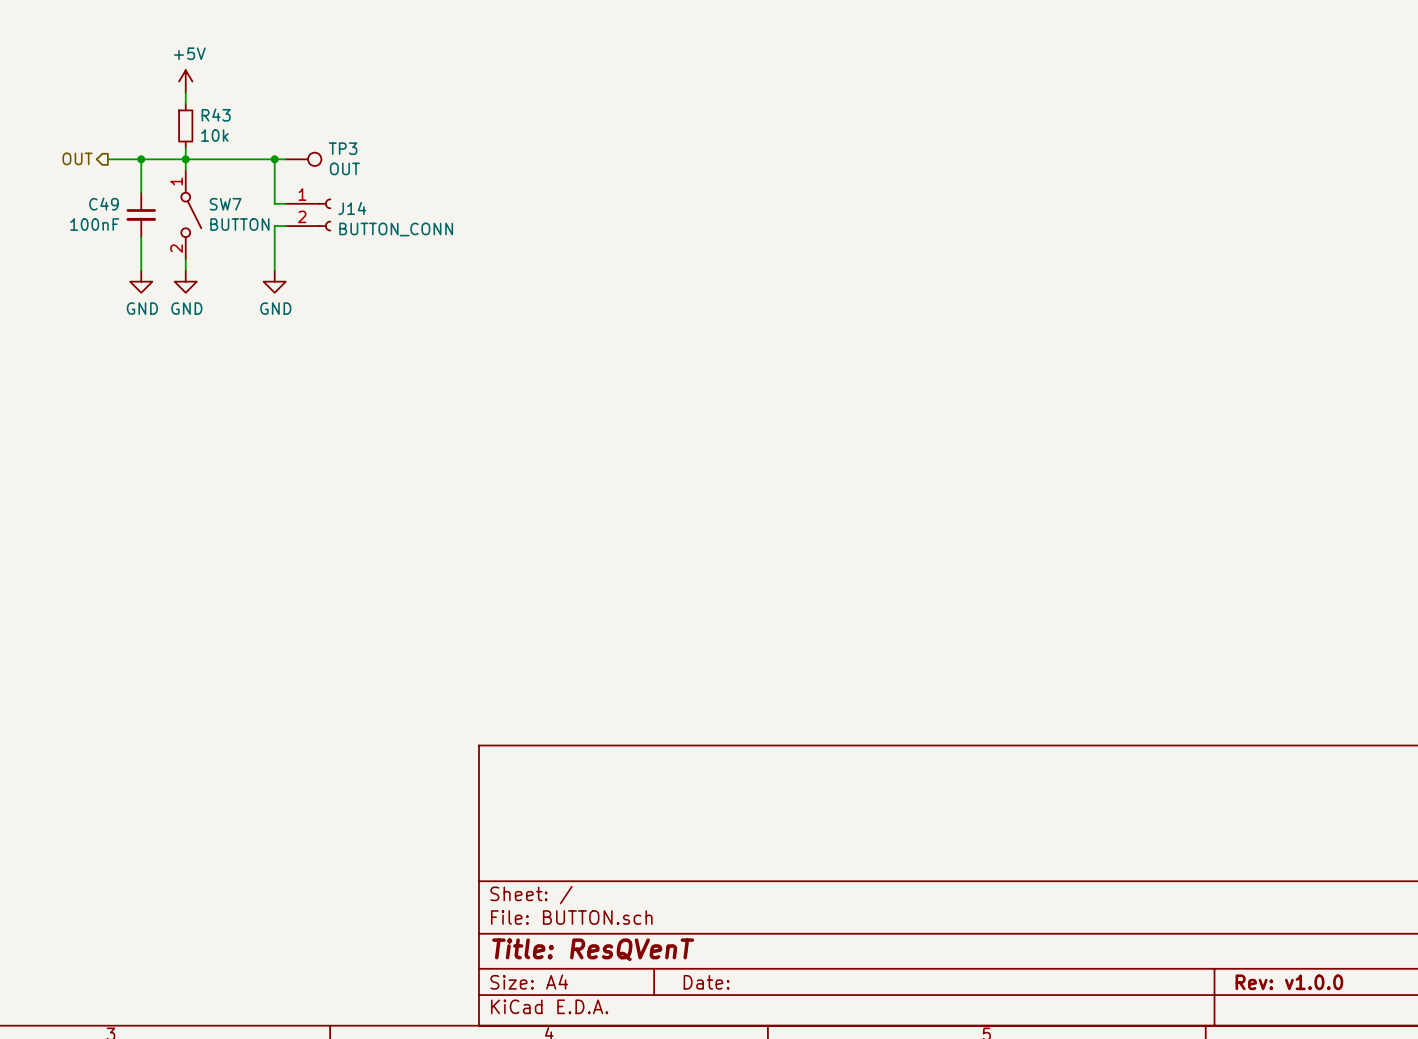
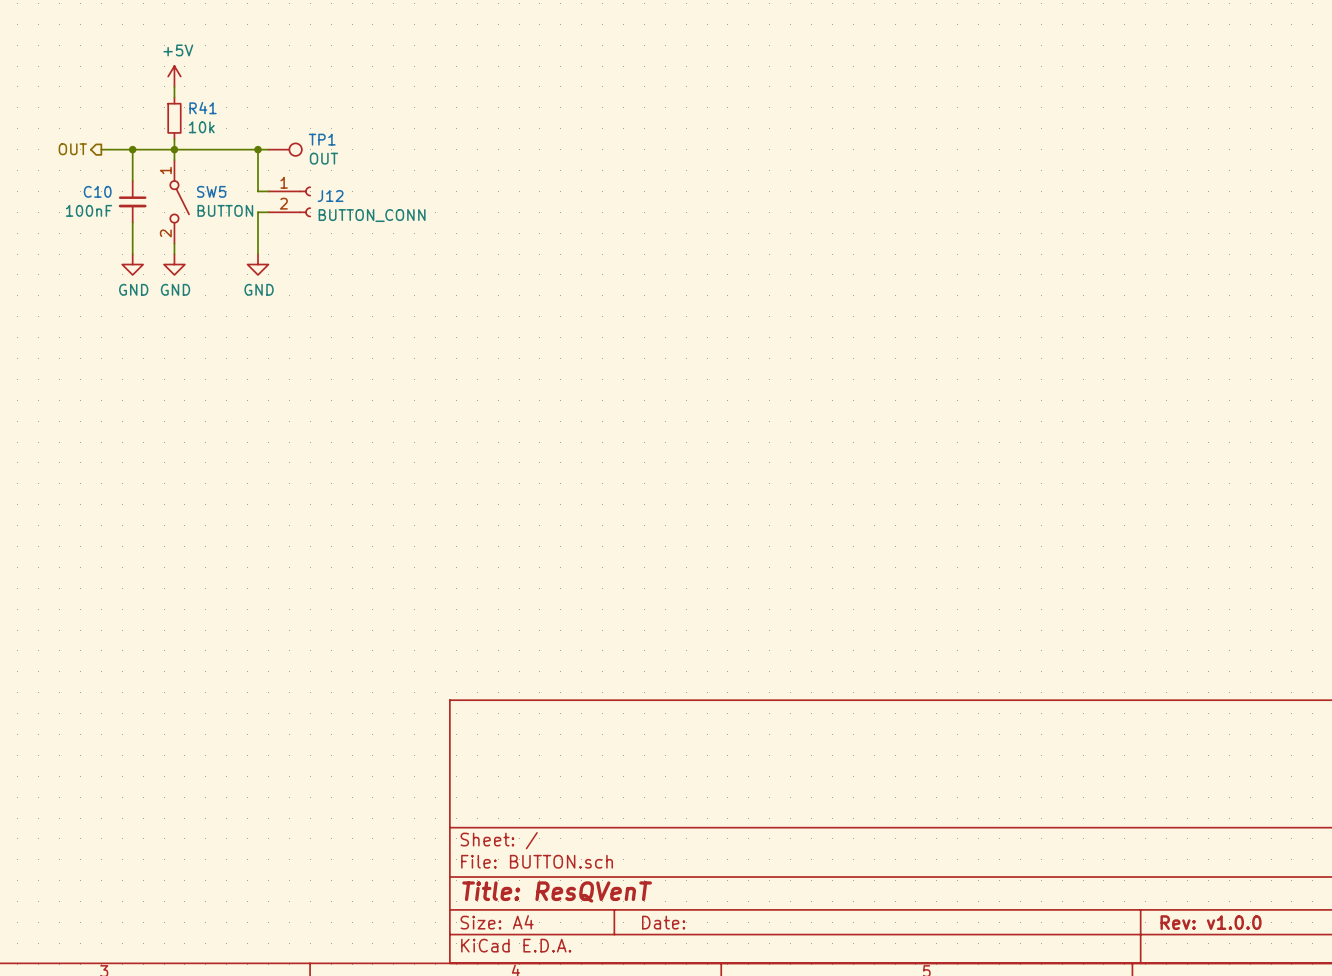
R43 name: R43 (216, 115) -> R41 (203, 108)
TP3 name: TP3 (343, 148) -> TP1 (322, 139)
C49 name: C49 (103, 204) -> C10 (97, 191)
SW7 name: SW7 (225, 204) -> SW5 (211, 191)
J14 name: J14 (352, 208) -> J12 (330, 196)

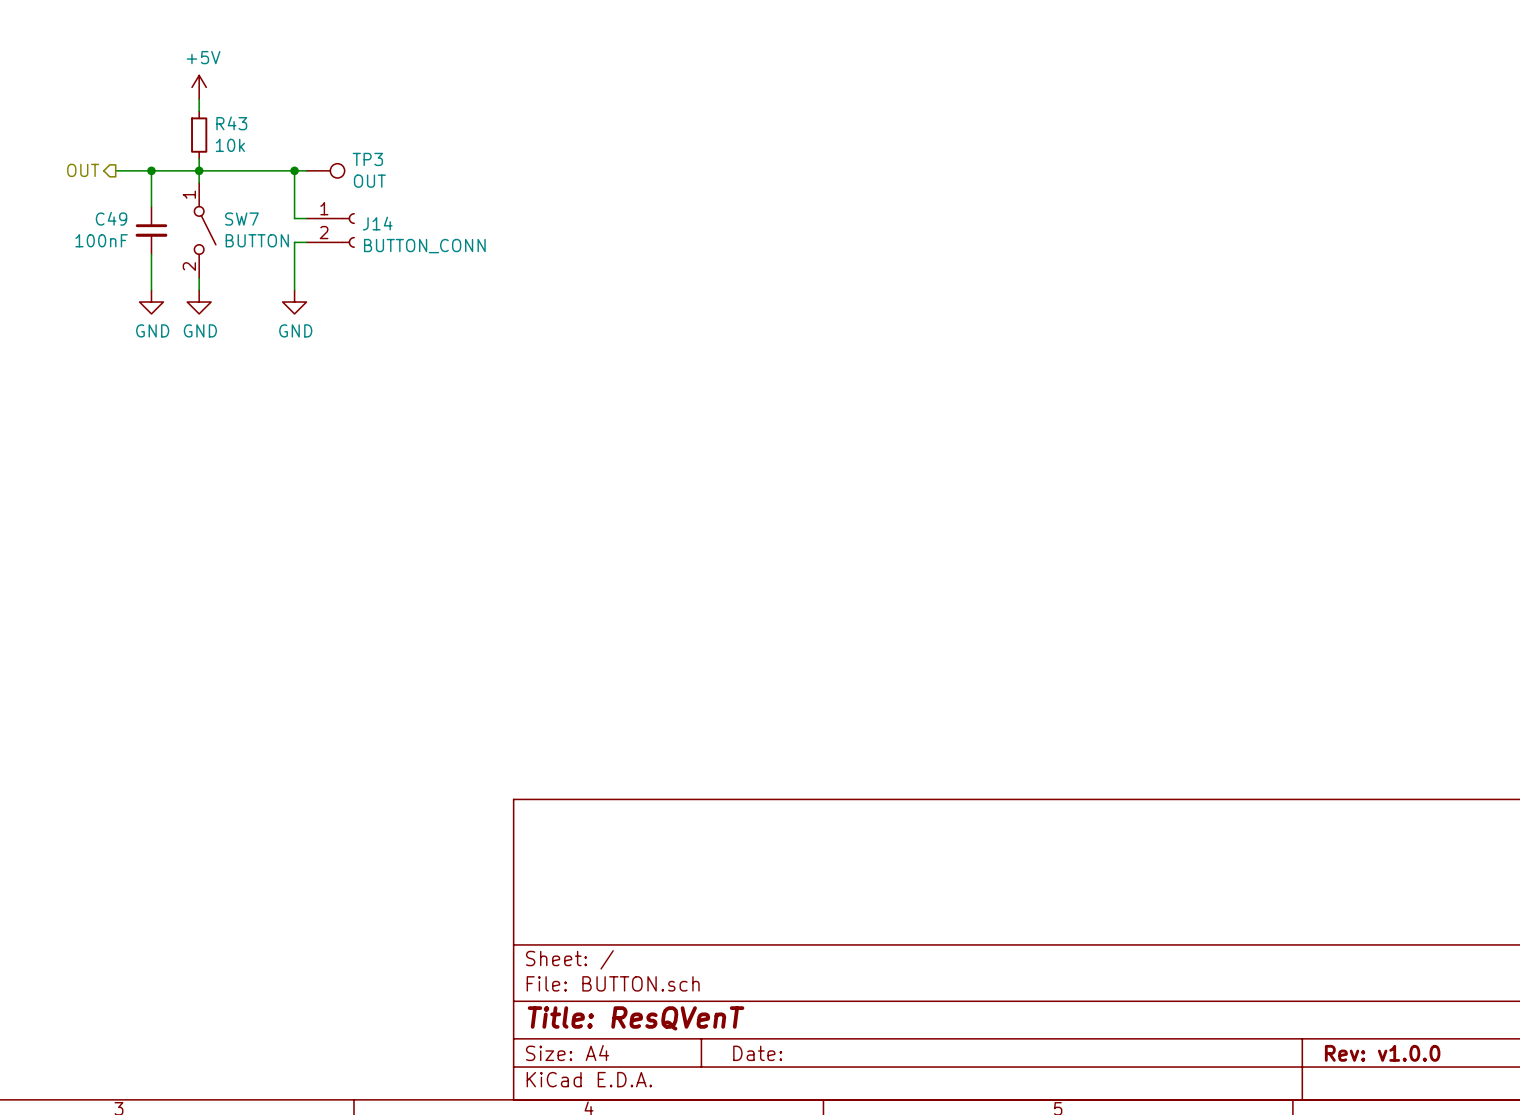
R41 name: R41 (203, 108) -> R43 (231, 123)
TP1 name: TP1 (322, 139) -> TP3 (367, 159)
C10 name: C10 (97, 191) -> C49 (111, 218)
SW5 name: SW5 (211, 191) -> SW7 (241, 219)
J12 name: J12 (330, 196) -> J14 (377, 223)

